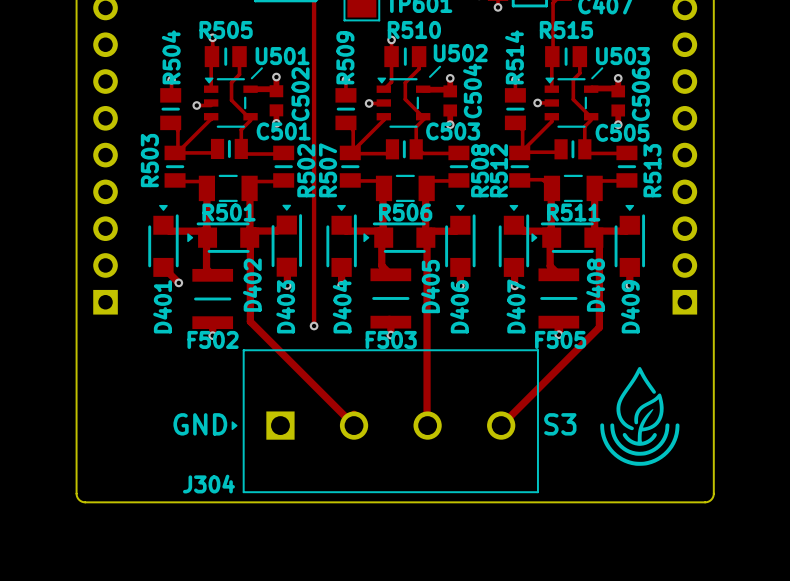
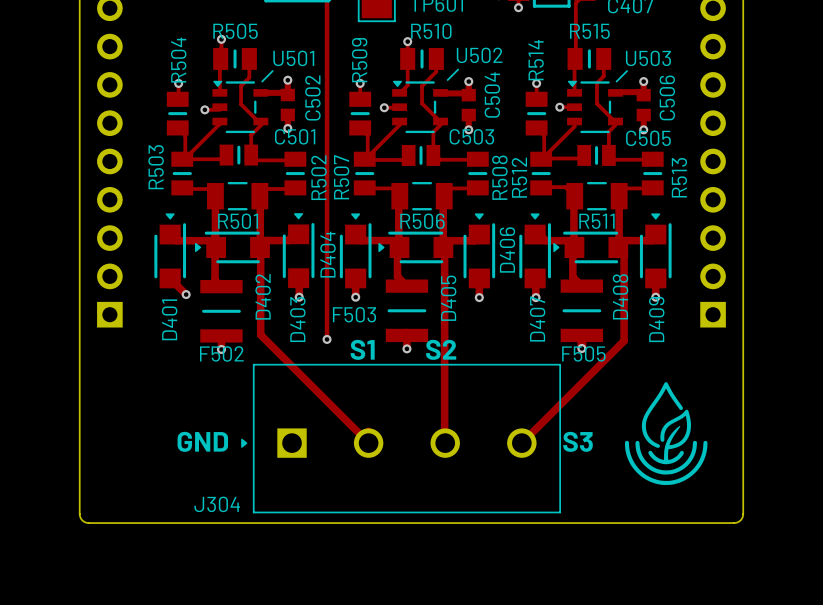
D404 name position: D404 (342, 306) -> D404 (327, 254)
D406 name position: D406 (459, 306) -> D406 (507, 249)
text: none -> S1 (362, 349)
text: none -> S2 (441, 349)
F503 name position: F503 (391, 339) -> F503 (354, 314)

